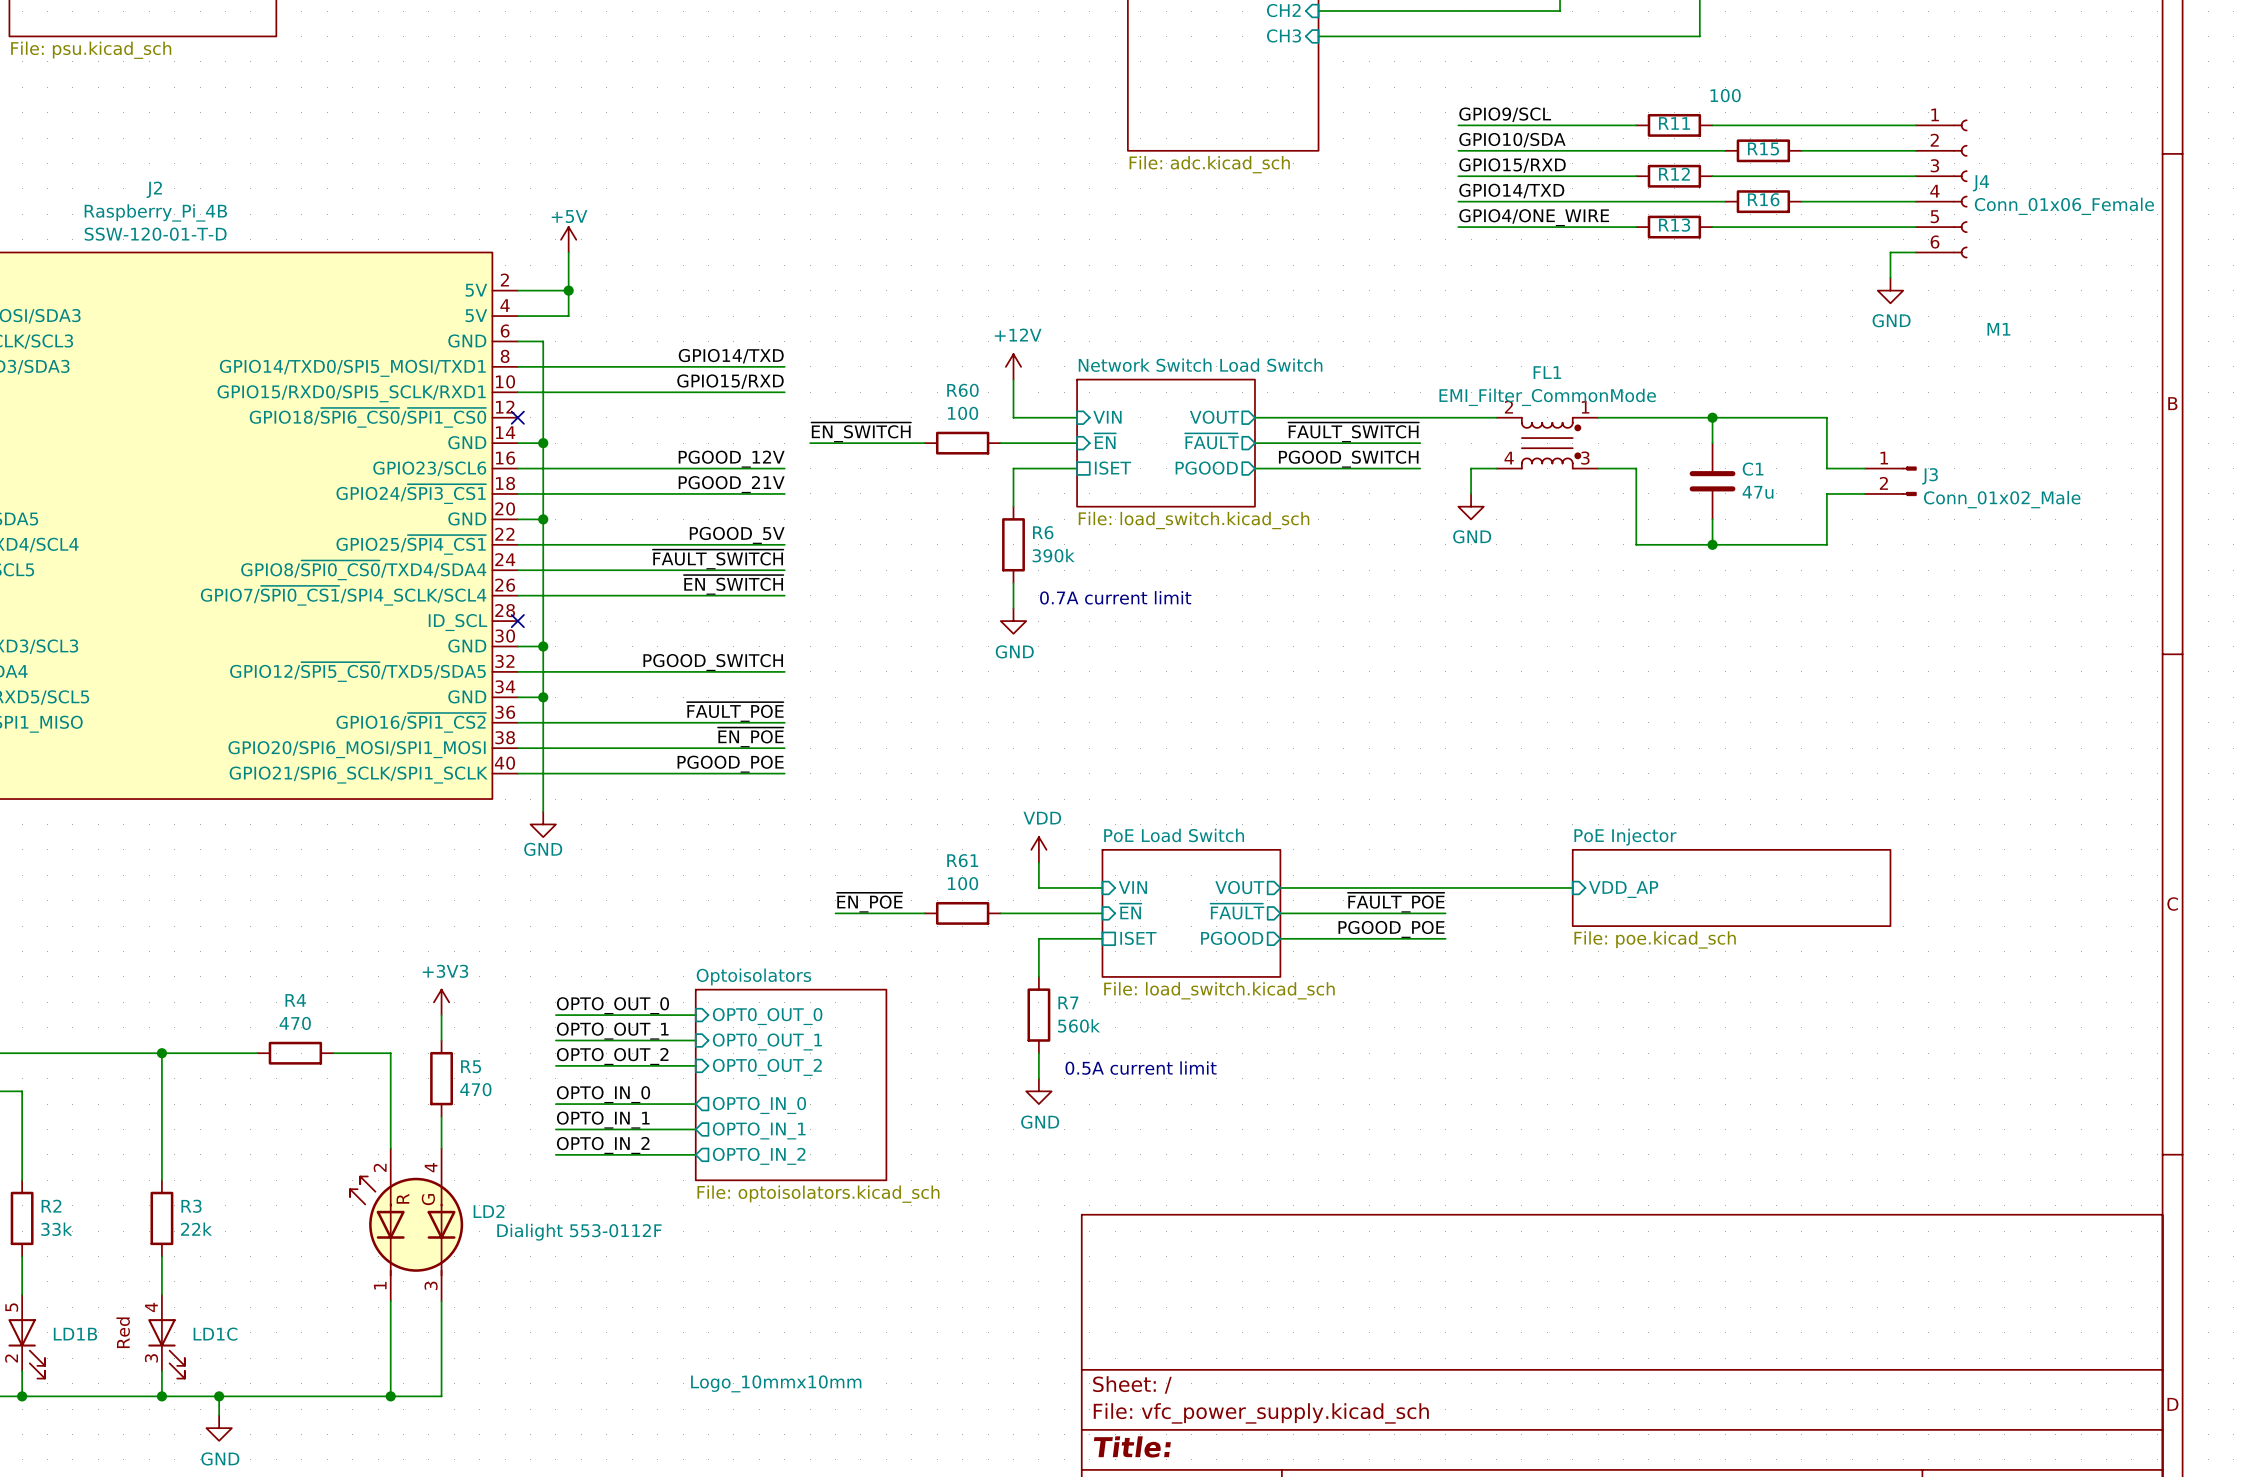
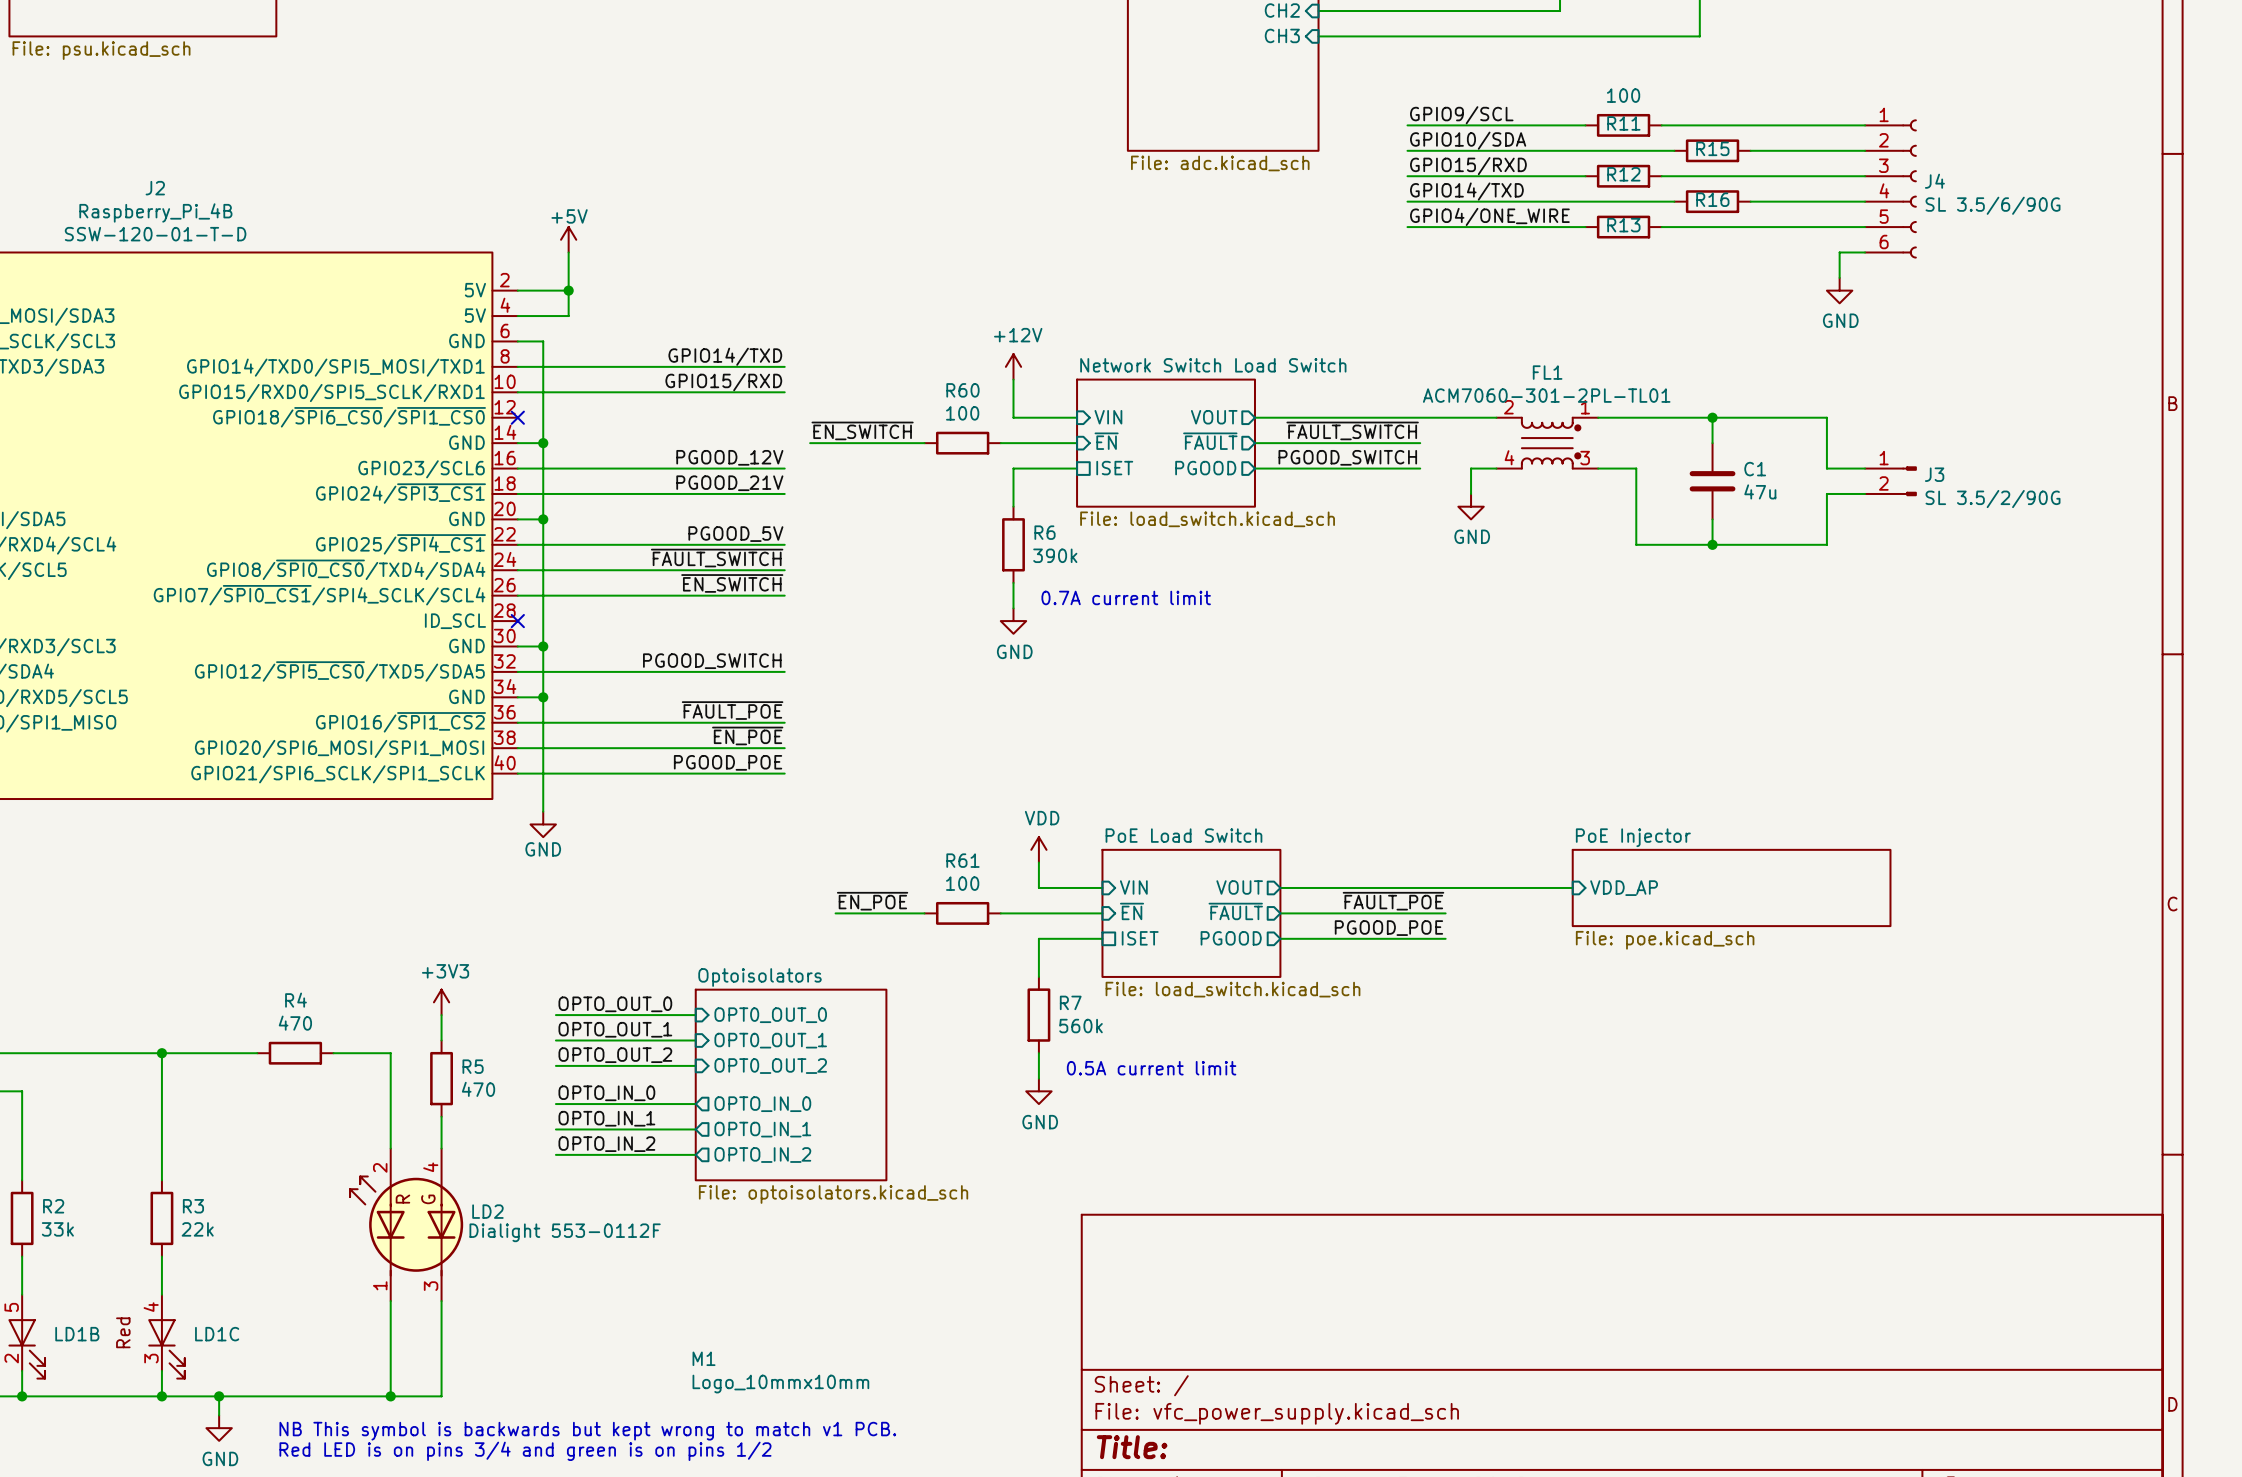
R11 value position: 100 (1725, 95) -> 100 (1623, 95)
label position: GPIO9/SCL (1505, 114) -> GPIO9/SCL (1461, 115)
wire: none -> (1407, 125) (1458, 125)
wire: (1585, 125) (1636, 125) -> (1661, 125) (1712, 125)
R11 position: (1674, 125) -> (1623, 125)
label position: GPIO10/SDA (1512, 140) -> GPIO10/SDA (1468, 140)
wire: none -> (1407, 150) (1458, 150)
wire: (1674, 150) (1725, 150) -> (1750, 150) (1801, 150)
R15 position: (1763, 150) -> (1712, 150)
label position: GPIO15/RXD (1512, 165) -> GPIO15/RXD (1468, 166)
wire: none -> (1407, 176) (1458, 176)
wire: (1585, 176) (1636, 176) -> (1661, 176) (1712, 176)
R12 position: (1674, 176) -> (1623, 176)
J4 position: (1941, 188) -> (1890, 188)
label position: GPIO14/TXD (1511, 191) -> GPIO14/TXD (1466, 191)
wire: none -> (1407, 201) (1458, 201)
wire: (1674, 201) (1725, 201) -> (1750, 201) (1801, 201)
R16 position: (1763, 201) -> (1712, 201)
J4 value: Conn_01x06_Female (2064, 206) -> SL 3.5/6/90G (1993, 205)
label position: GPIO4/ONE_WIRE (1534, 217) -> GPIO4/ONE_WIRE (1489, 216)
wire: none -> (1407, 227) (1458, 227)
wire: (1585, 227) (1636, 227) -> (1661, 227) (1712, 227)
R13 position: (1674, 227) -> (1623, 227)
wire: (1915, 252) (1890, 252) (1890, 277) -> (1865, 252) (1839, 252) (1839, 277)
power symbol position: GND (1890, 290) -> GND (1839, 290)
M1 name position: M1 (1998, 329) -> M1 (704, 1358)
FL1 value: EMI_Filter_CommonMode (1547, 397) -> ACM7060-301-2PL-TL01 (1546, 395)
J3 value: Conn_01x02_Male (2002, 499) -> SL 3.5/2/90G (1993, 499)
M1 position: (1350, 857) -> (780, 1372)
text: none -> NB This symbol is backwards but kept wrong to match v1 PCB. (587, 1431)
text: none -> Red LED is on pins 3/4 and green is on pins 1/2 (525, 1451)

